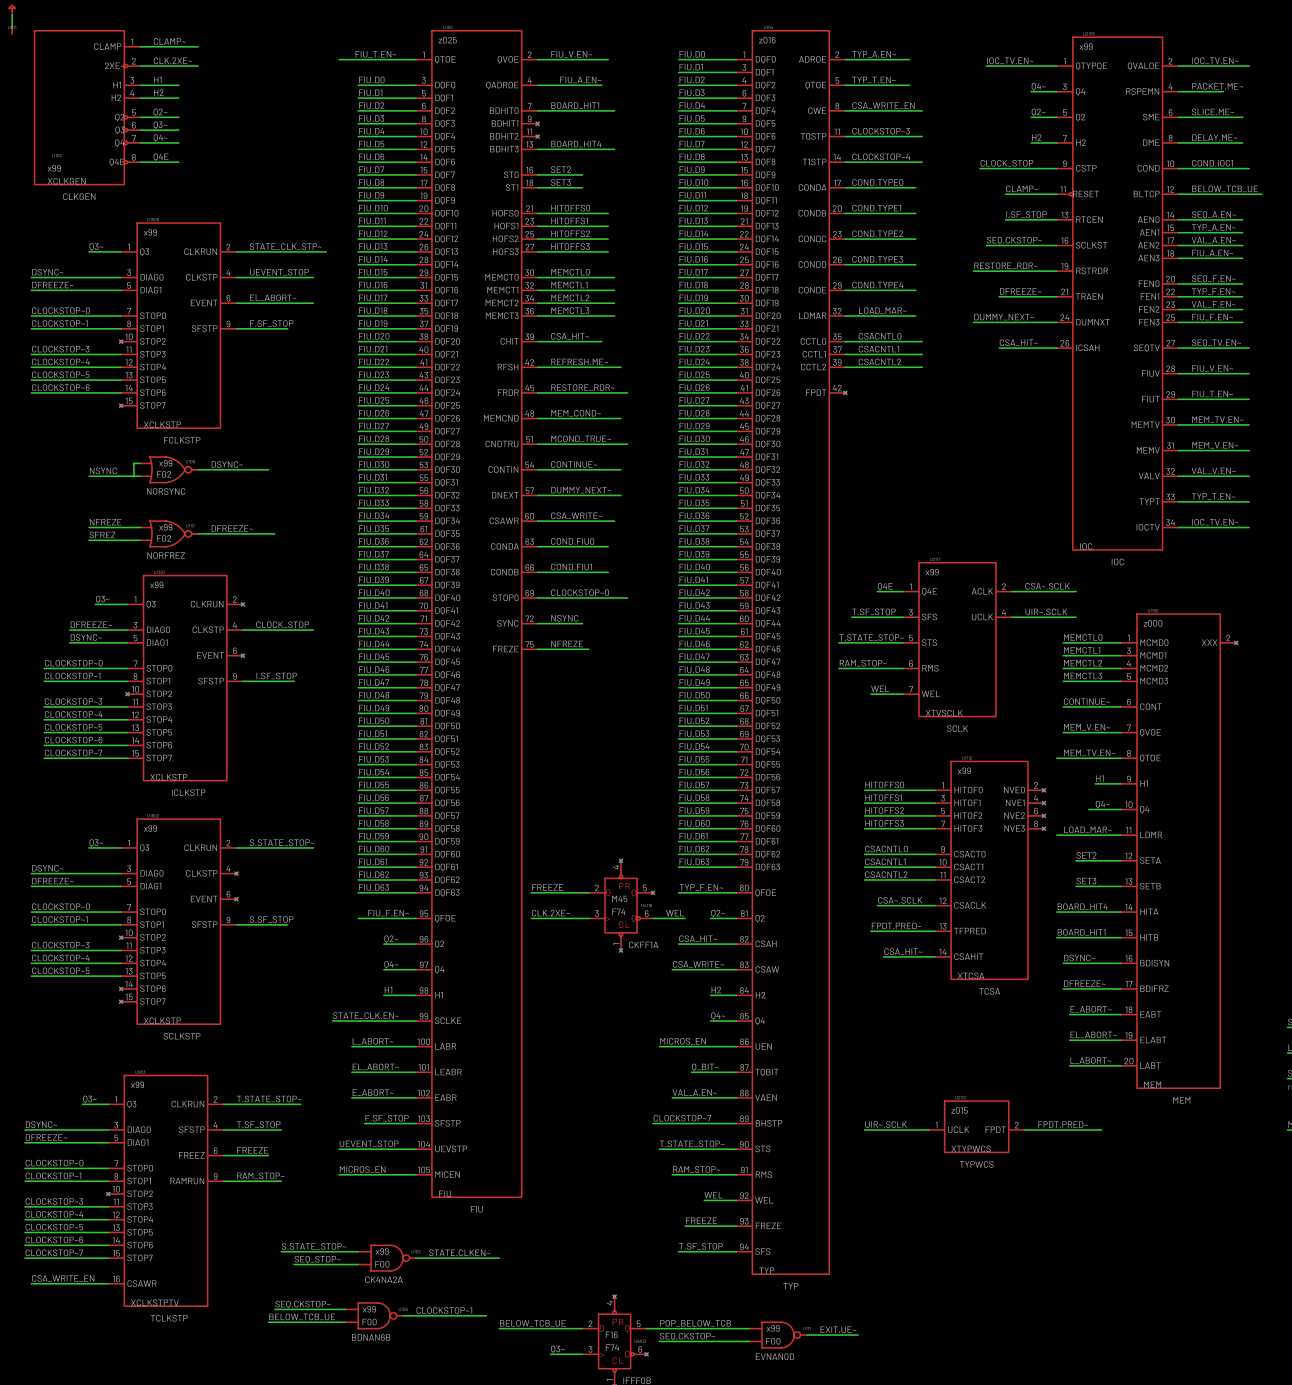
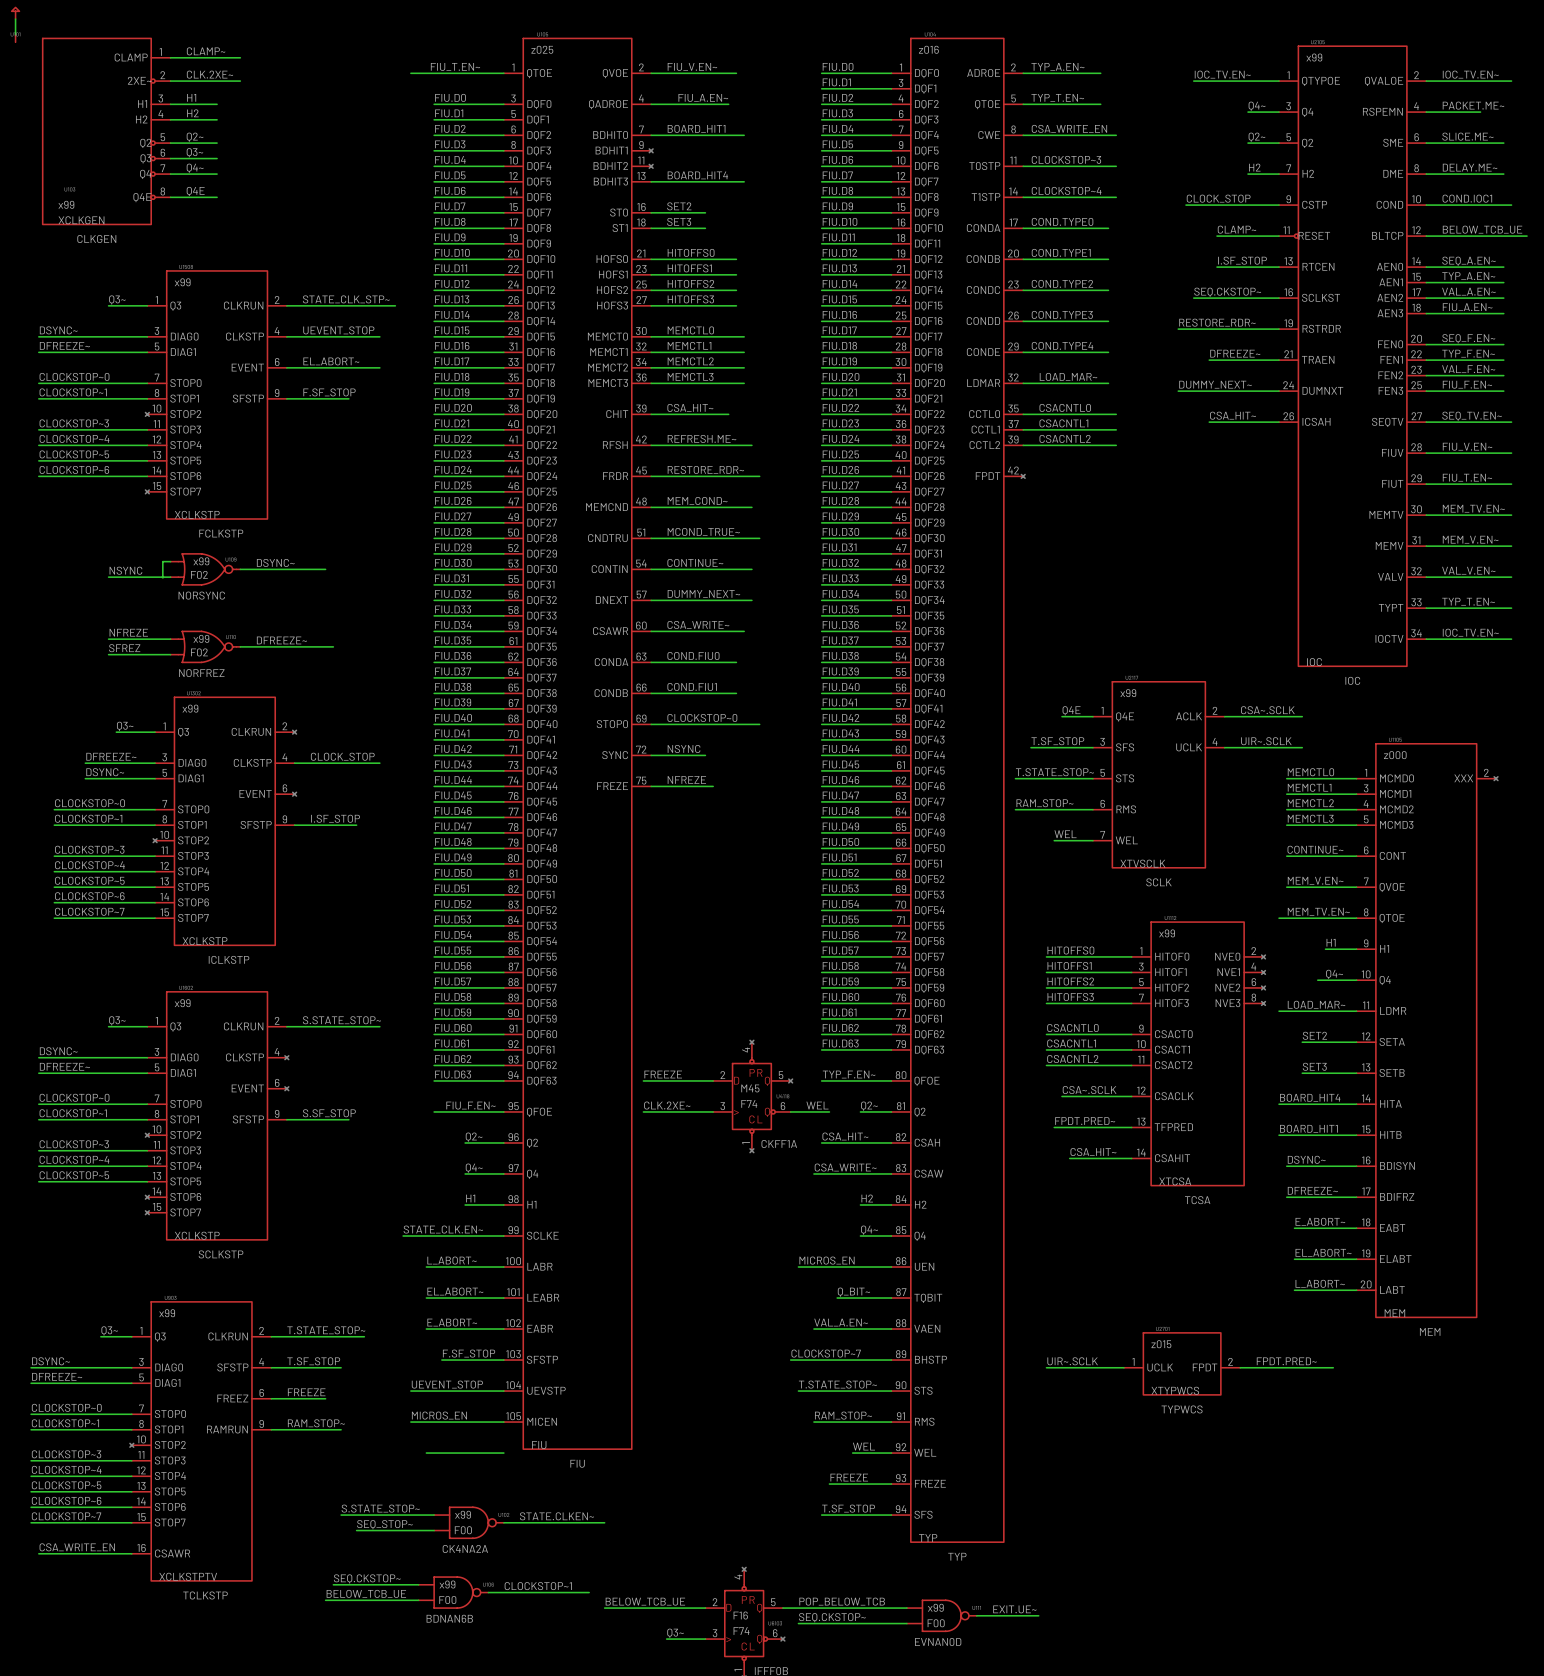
wire: none -> (426, 1453) (503, 1453)

